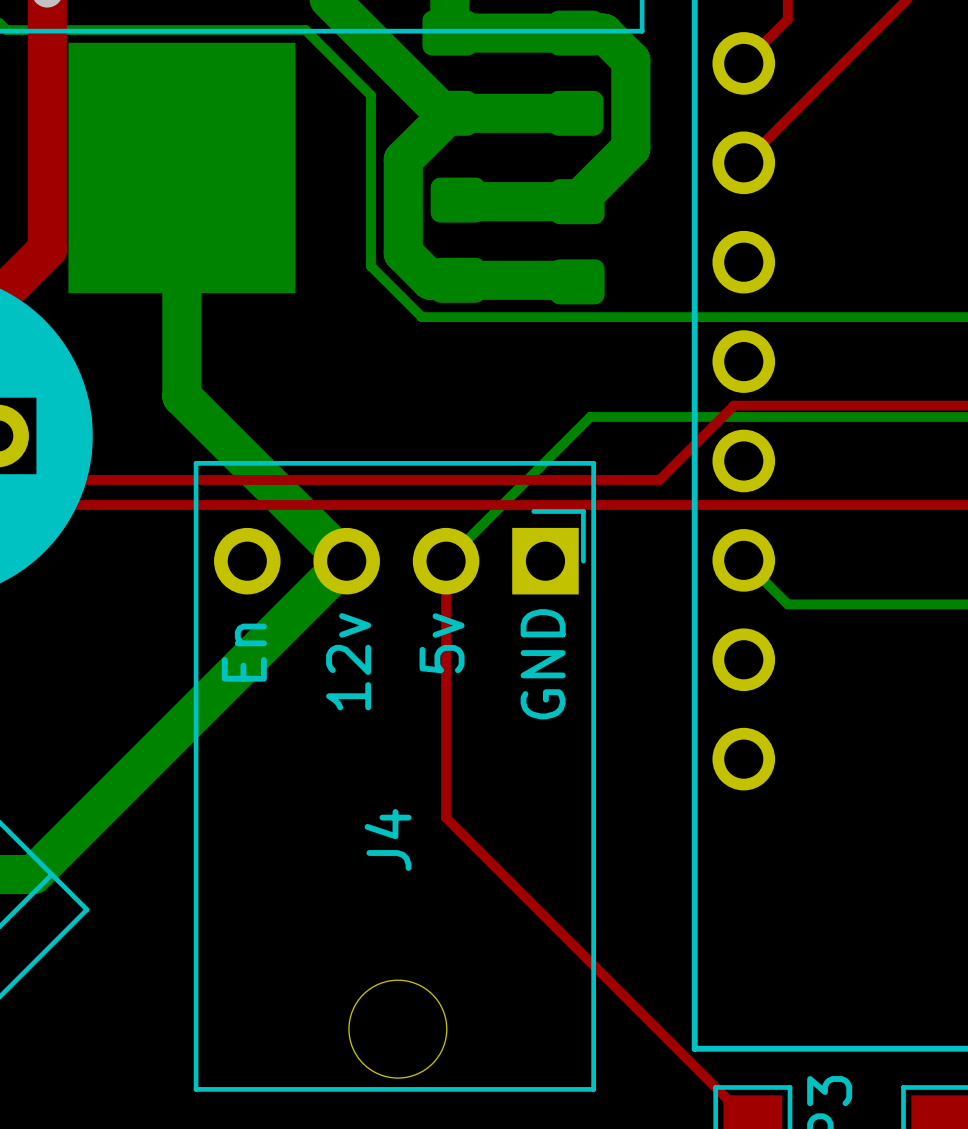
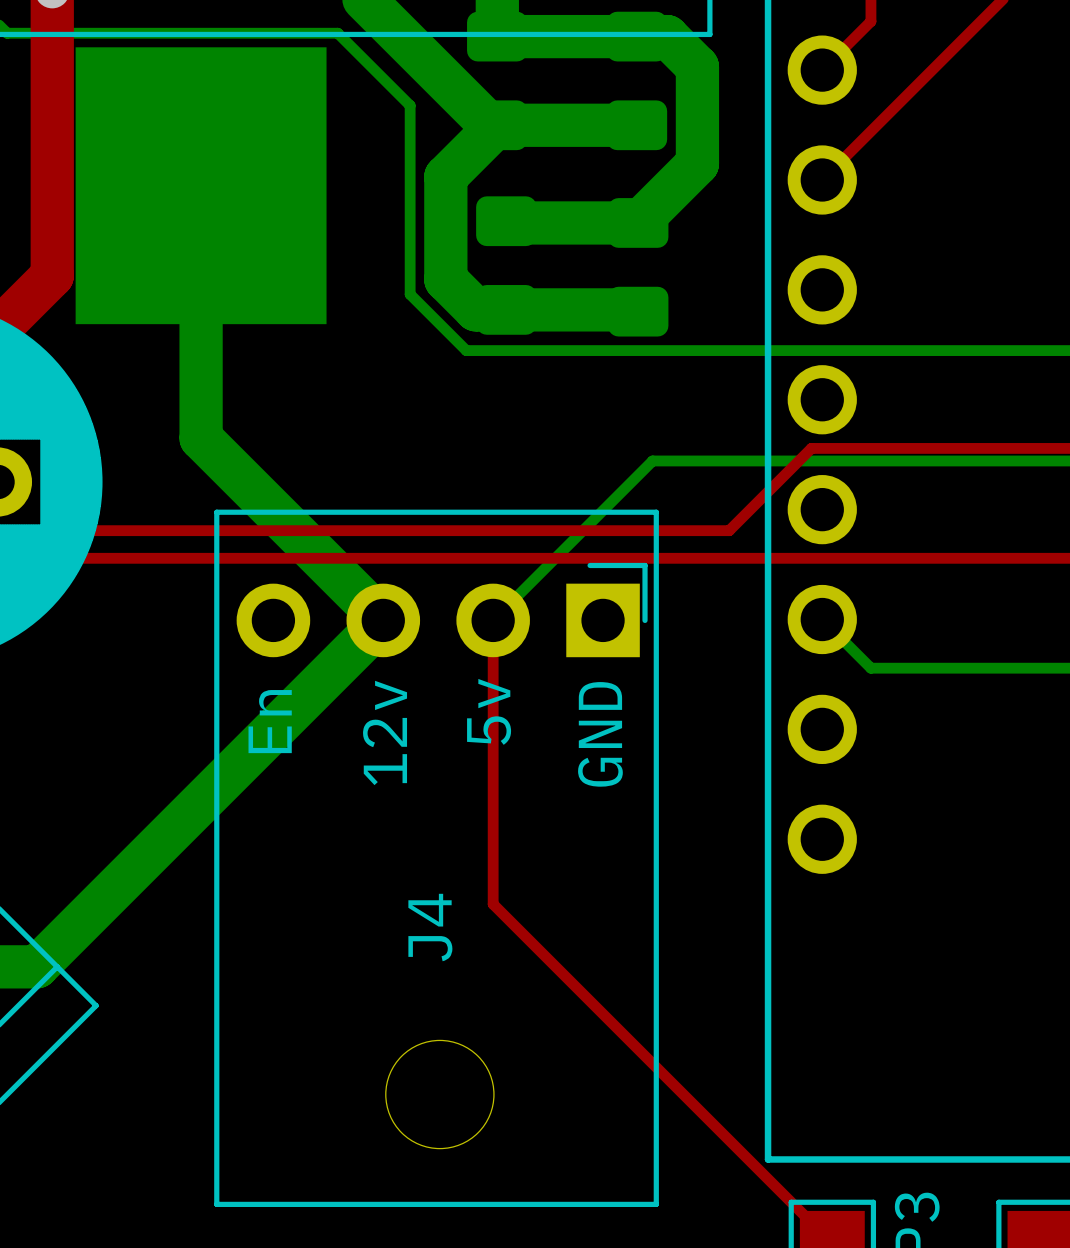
J4 footprint: [193, 460, 596, 1092] -> [214, 509, 659, 1207]

